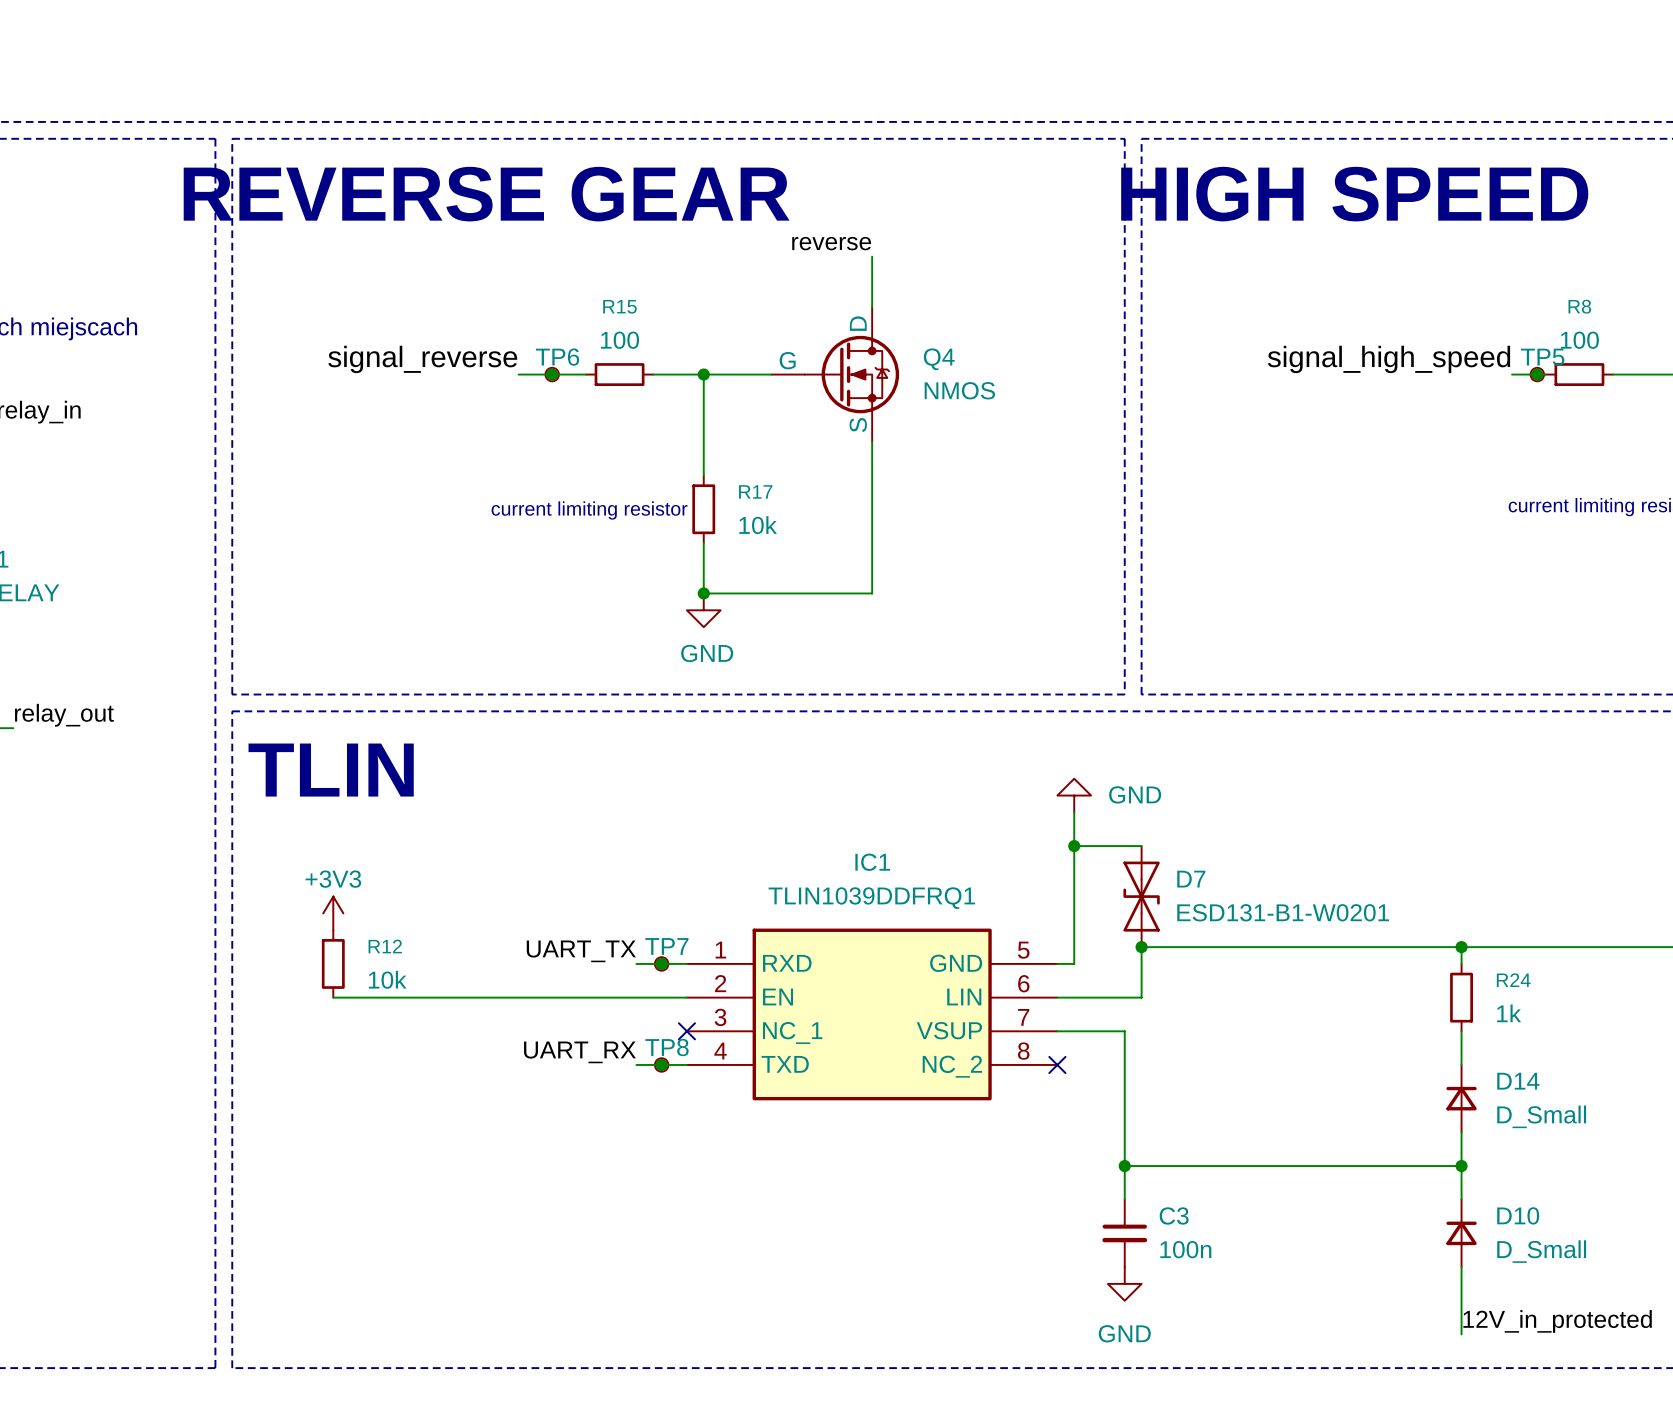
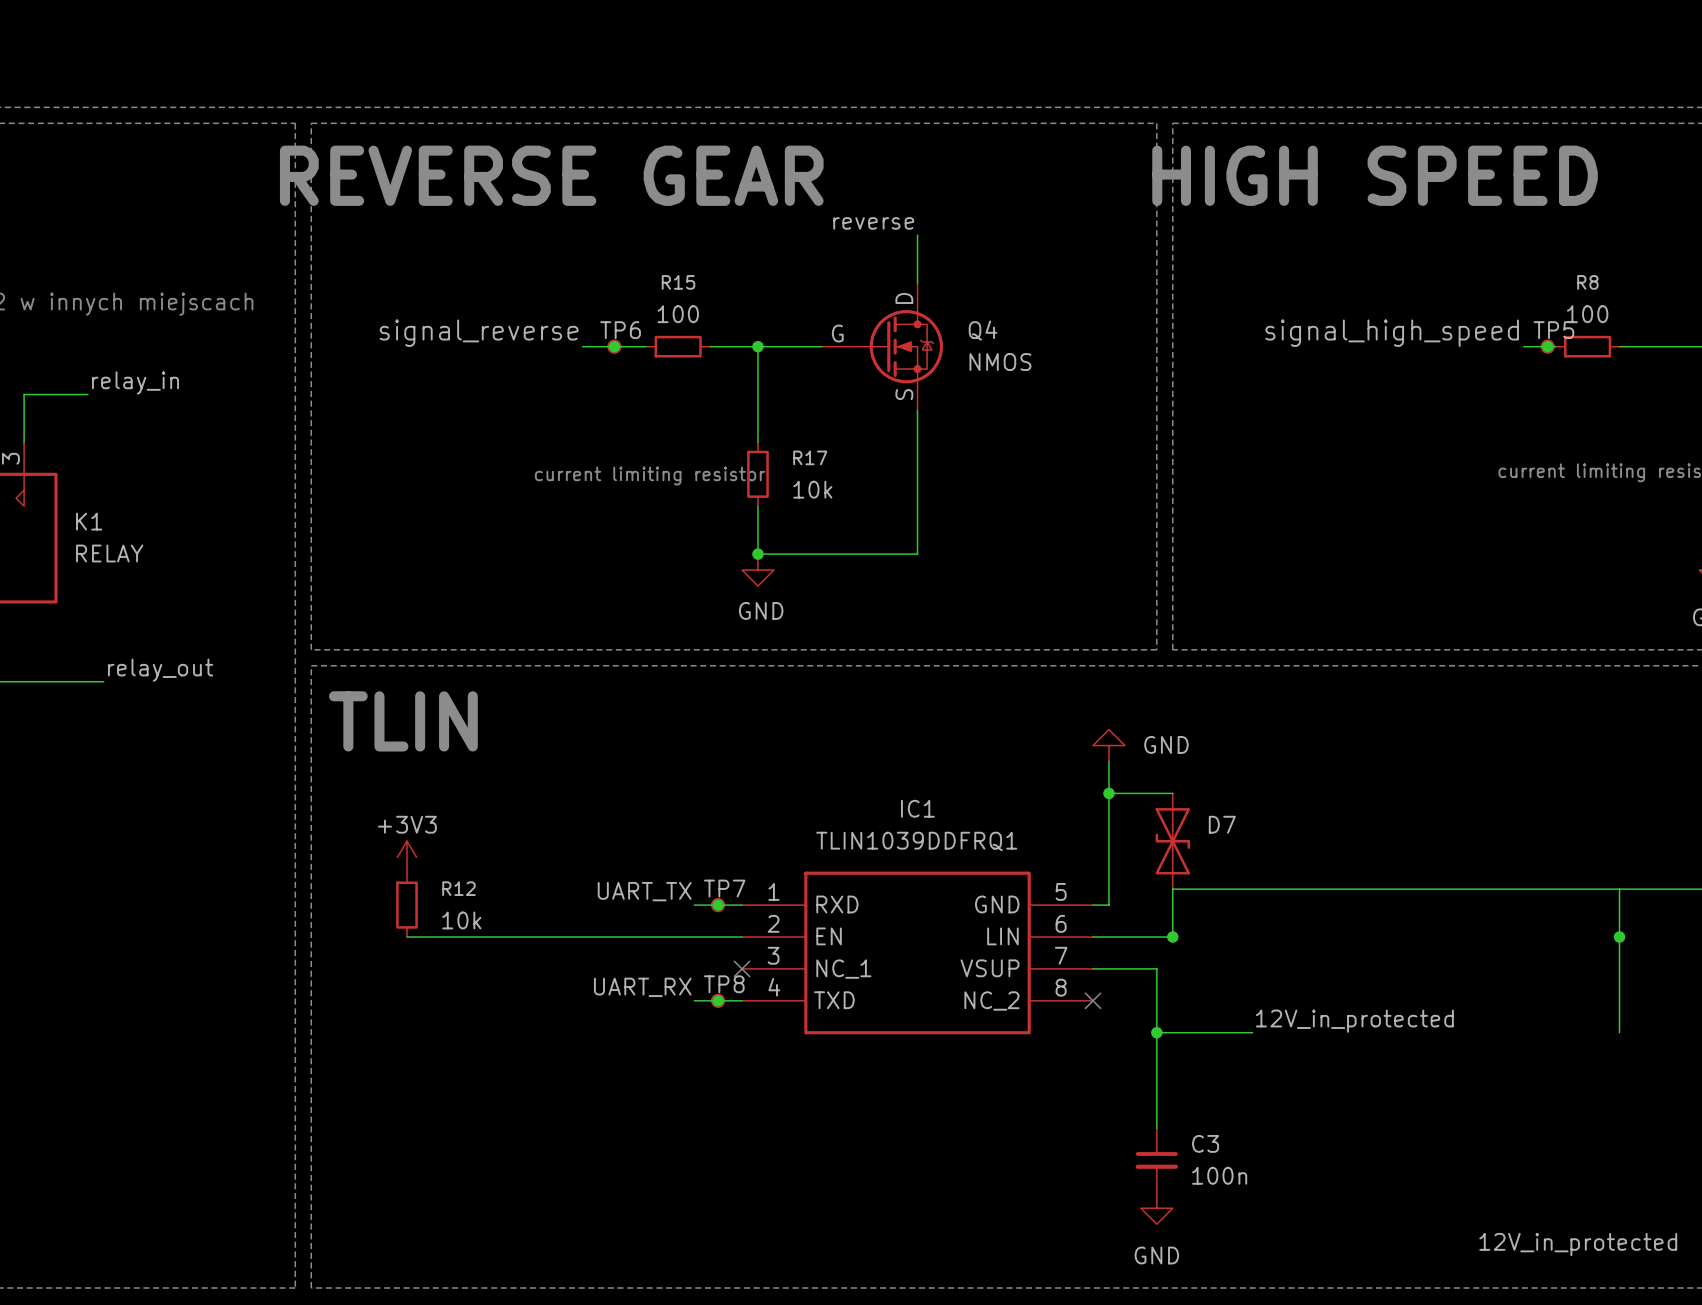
D7 value: ESD131-B1-W0201 (1283, 912) -> none
junction position: (1141, 947) -> (1172, 937)
wire: (1461, 947) (1461, 963) -> none
junction: (1461, 947) -> none
wire: none -> (1619, 889) (1619, 1032)
R24: 1k (1461, 997) -> none
junction: none -> (1619, 937)
wire: (1461, 1031) (1461, 1064) -> none
label: none -> 12V_in_protected (1354, 1021)
wire: none -> (1156, 1032) (1252, 1032)
D14: D_Small (1461, 1098) -> none
wire: (1461, 1132) (1461, 1199) -> none
wire: (1124, 1166) (1461, 1166) -> none
junction position: (1124, 1166) -> (1156, 1032)
junction: (1461, 1166) -> none
D10: D_Small (1461, 1233) -> none
wire: (1461, 1267) (1461, 1334) -> none

